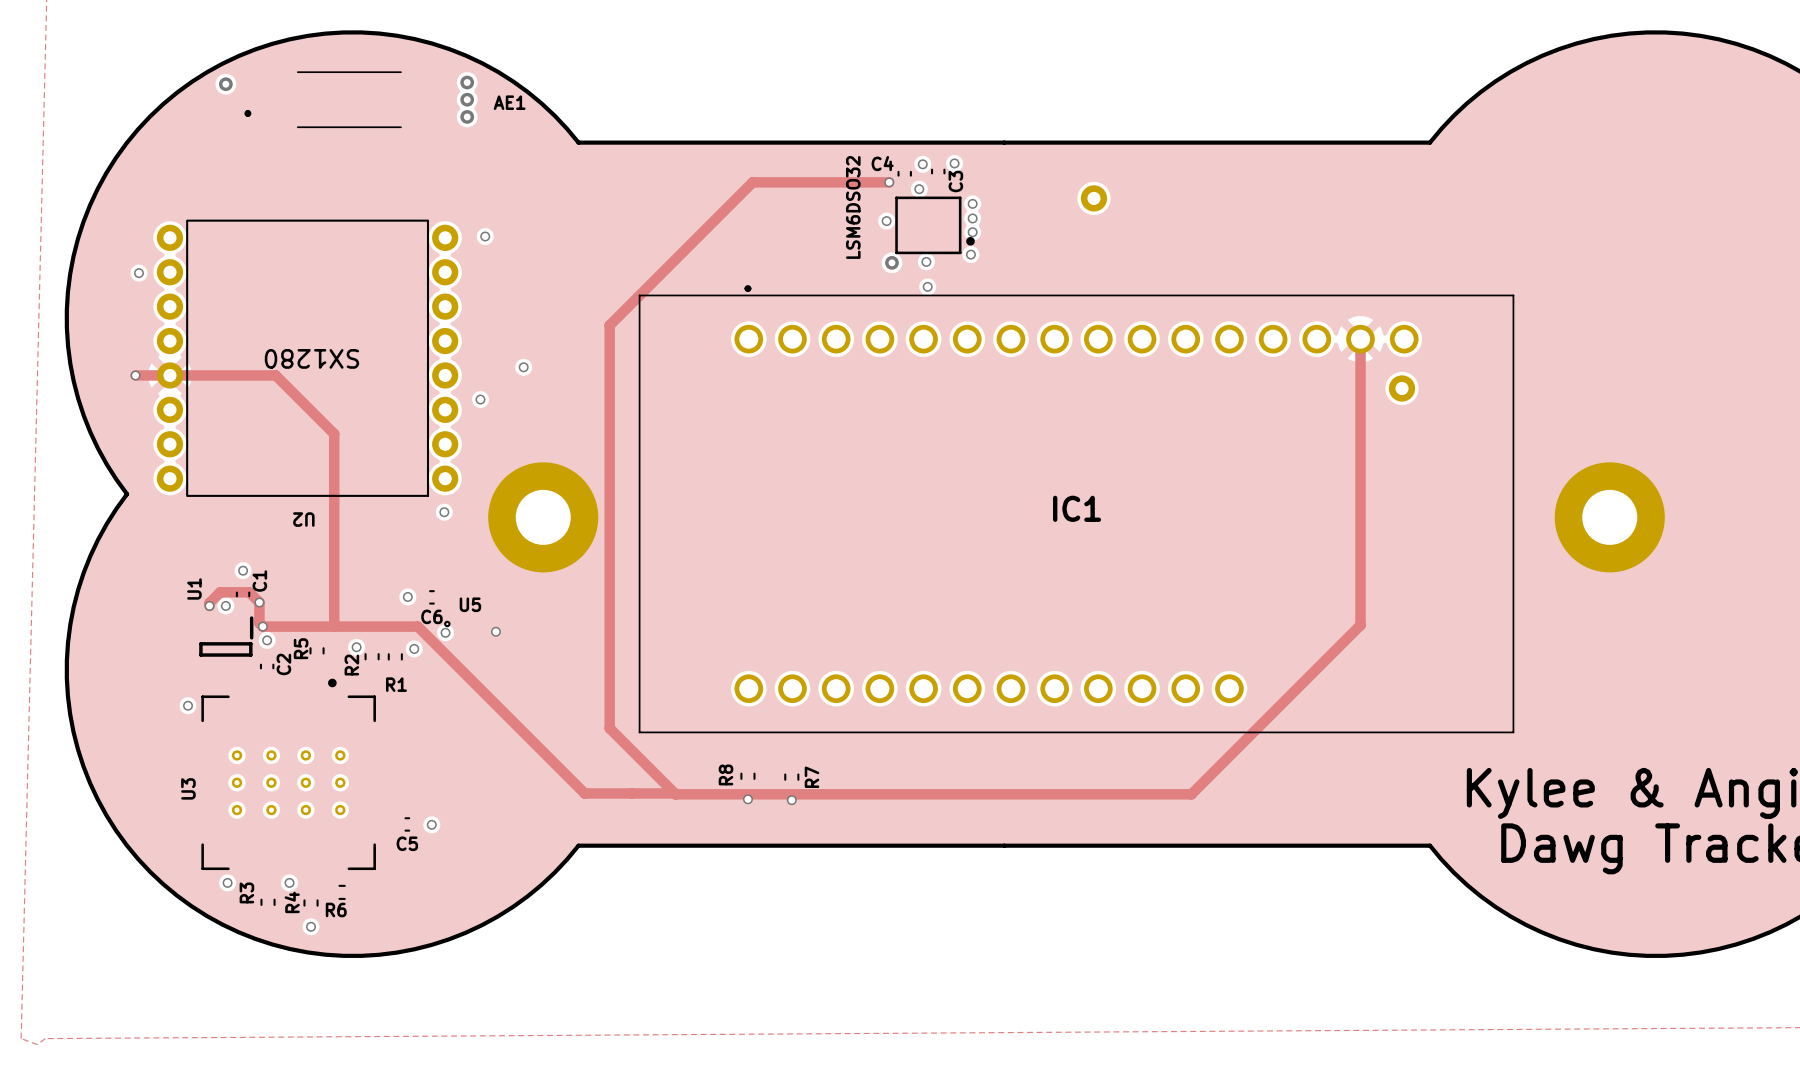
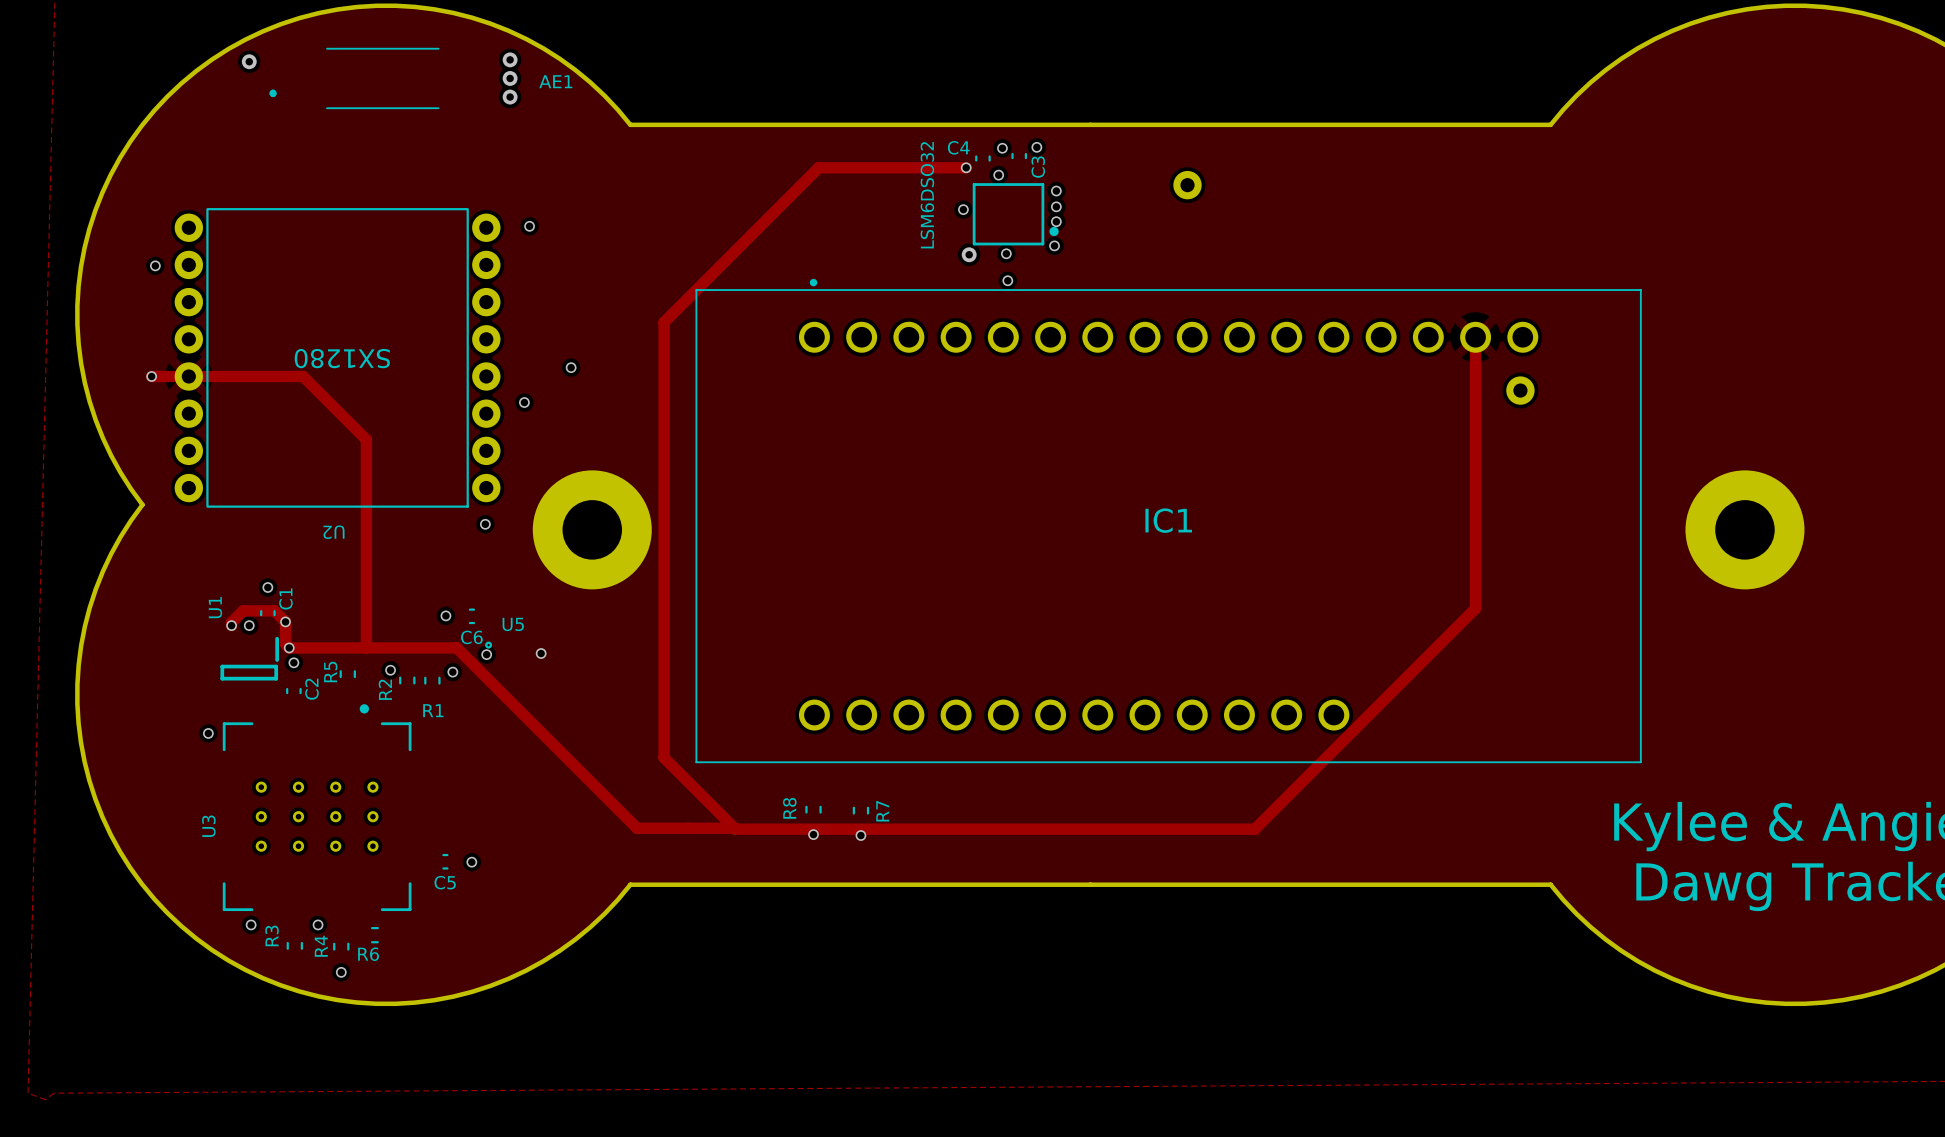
track: (1360, 590) (1360, 625) (1191, 794) (1156, 794) -> (1475, 608) (1254, 829)

